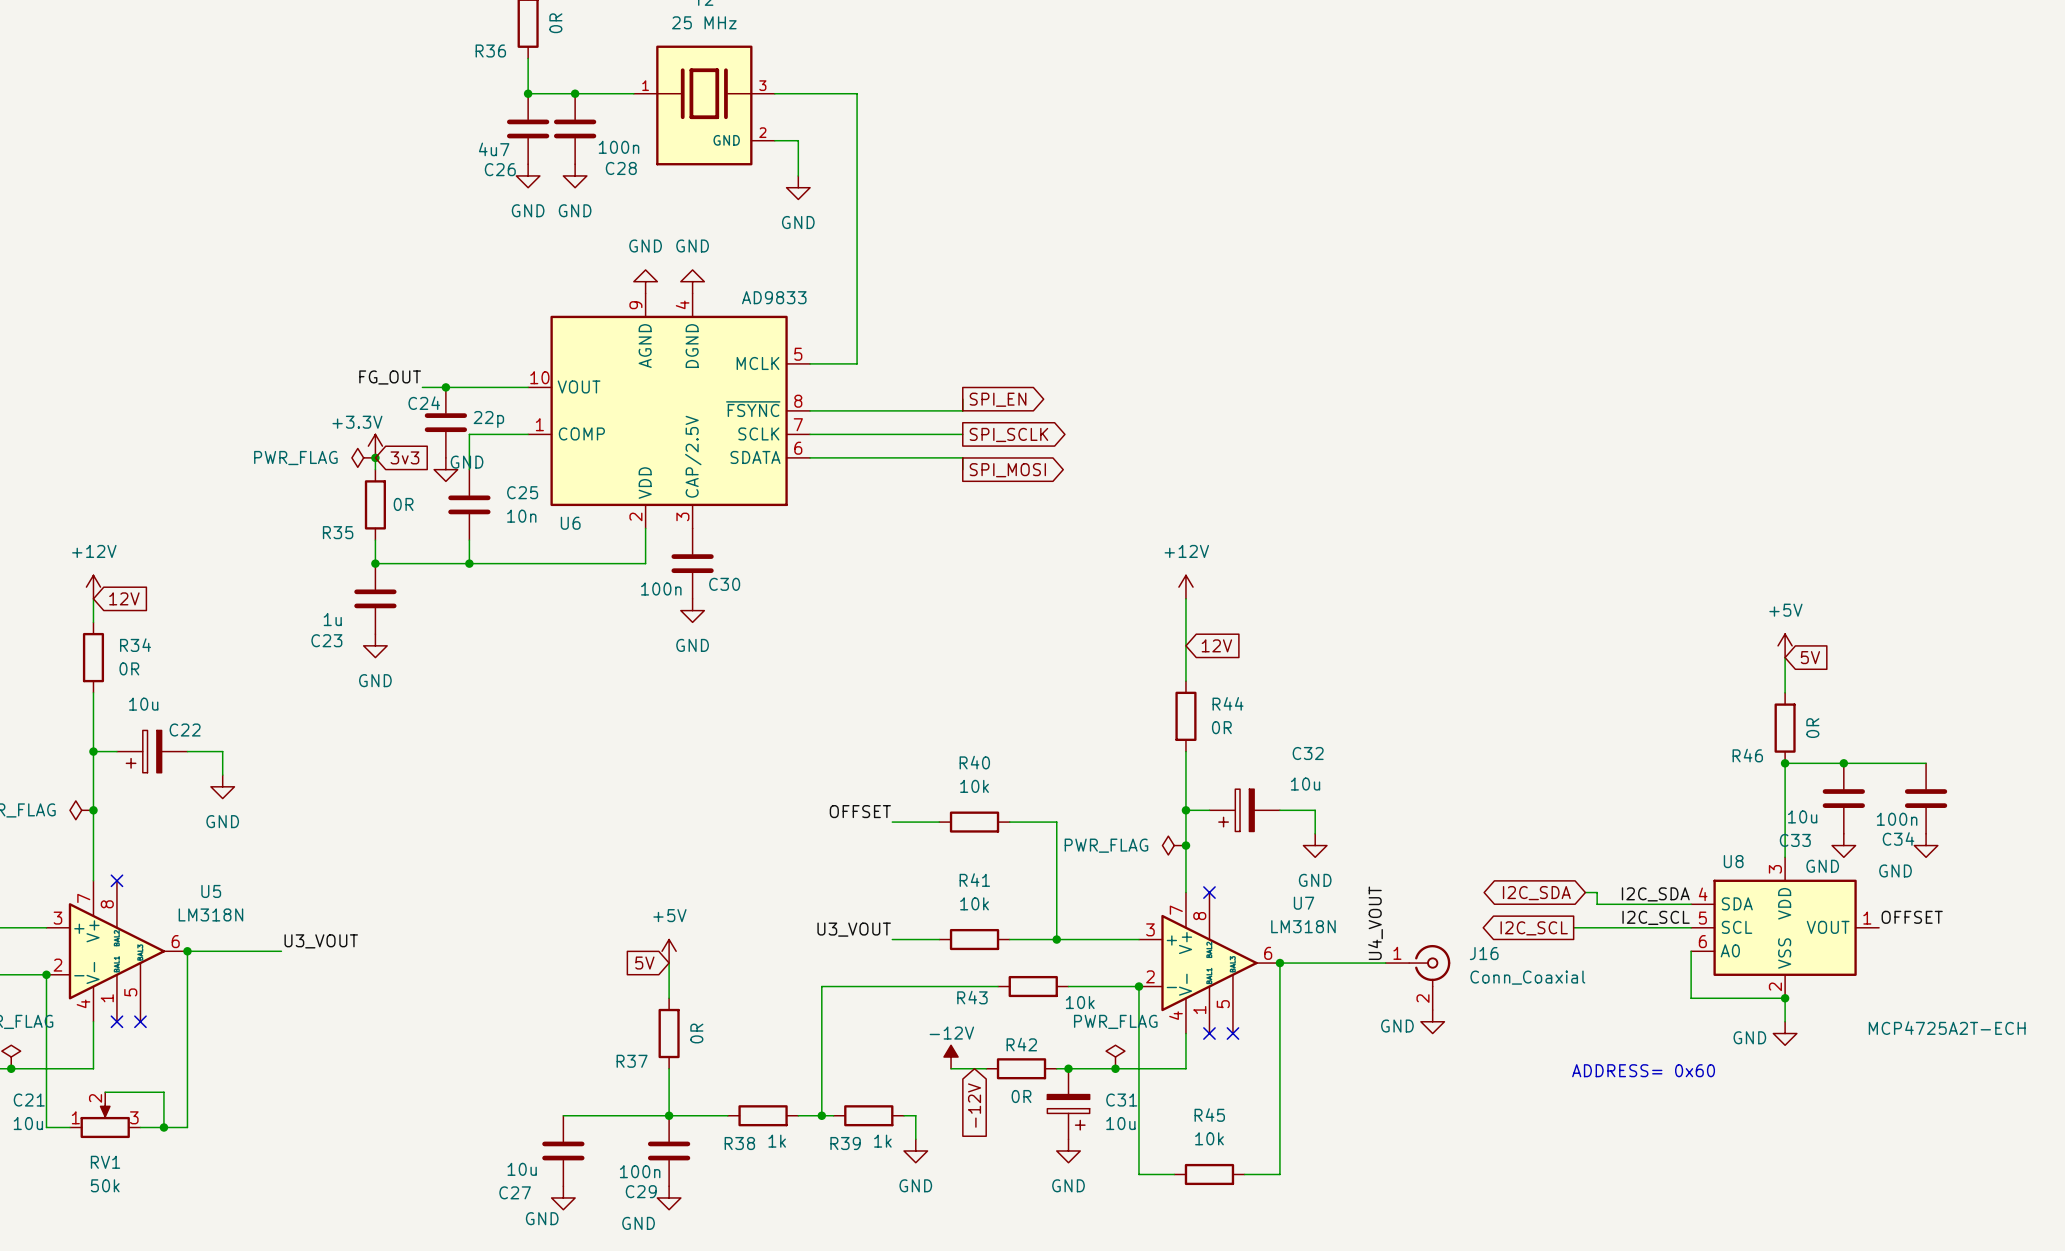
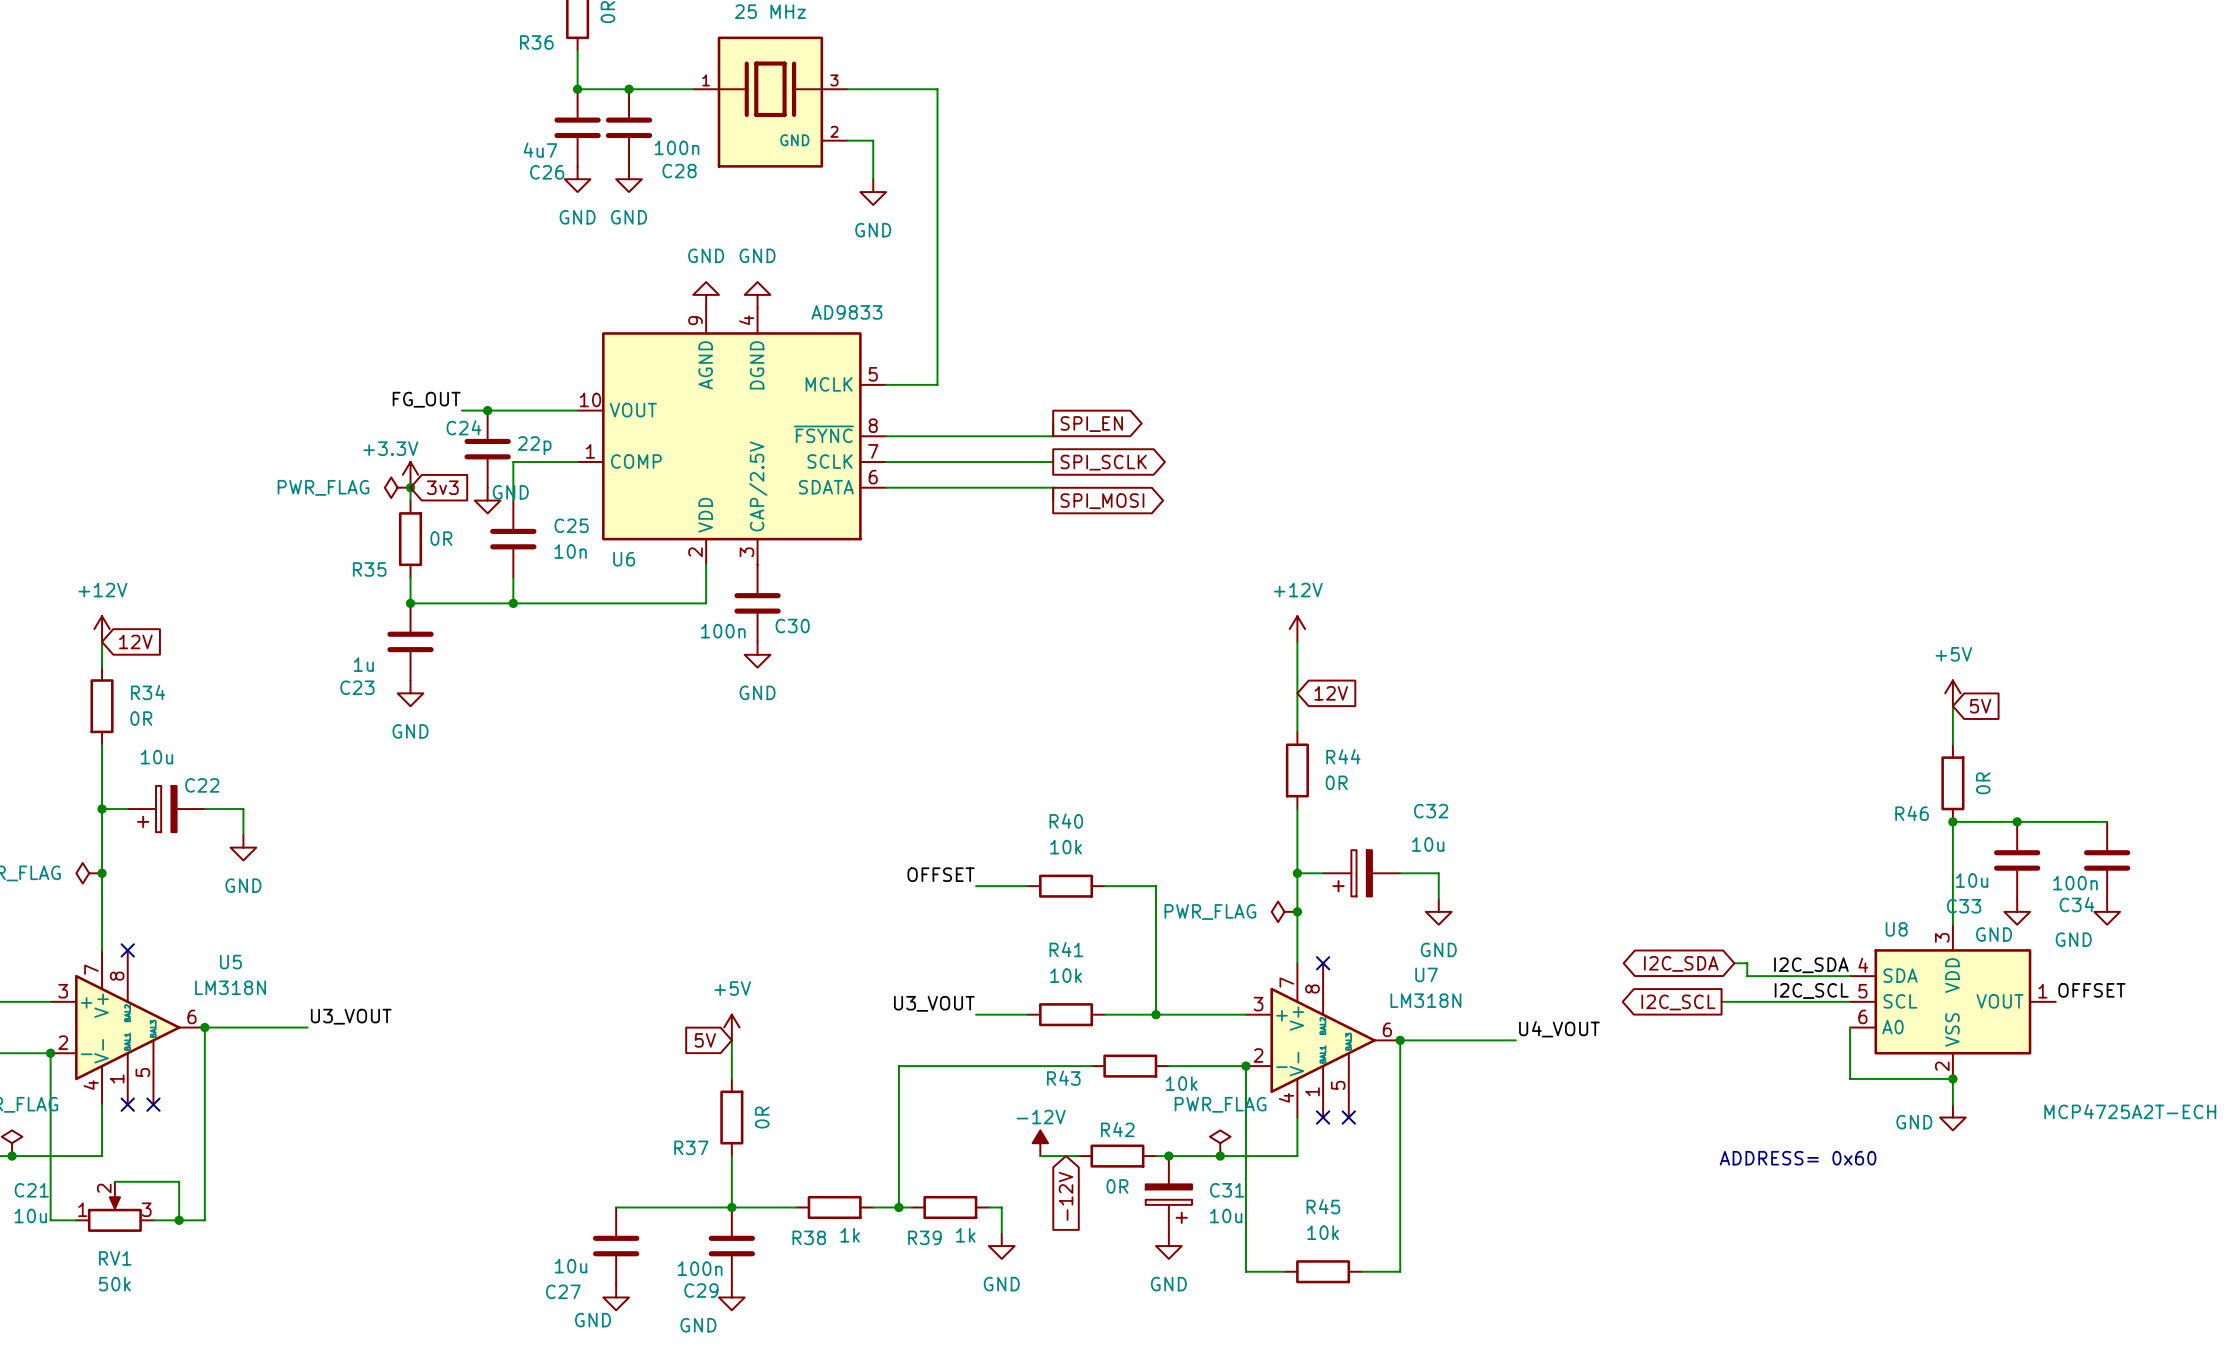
label rotation: 0° (1375, 923) -> 90° clockwise (1559, 1029)
J16: Conn_Coaxial (1417, 977) -> none
power symbol: GND (1432, 1021) -> none

